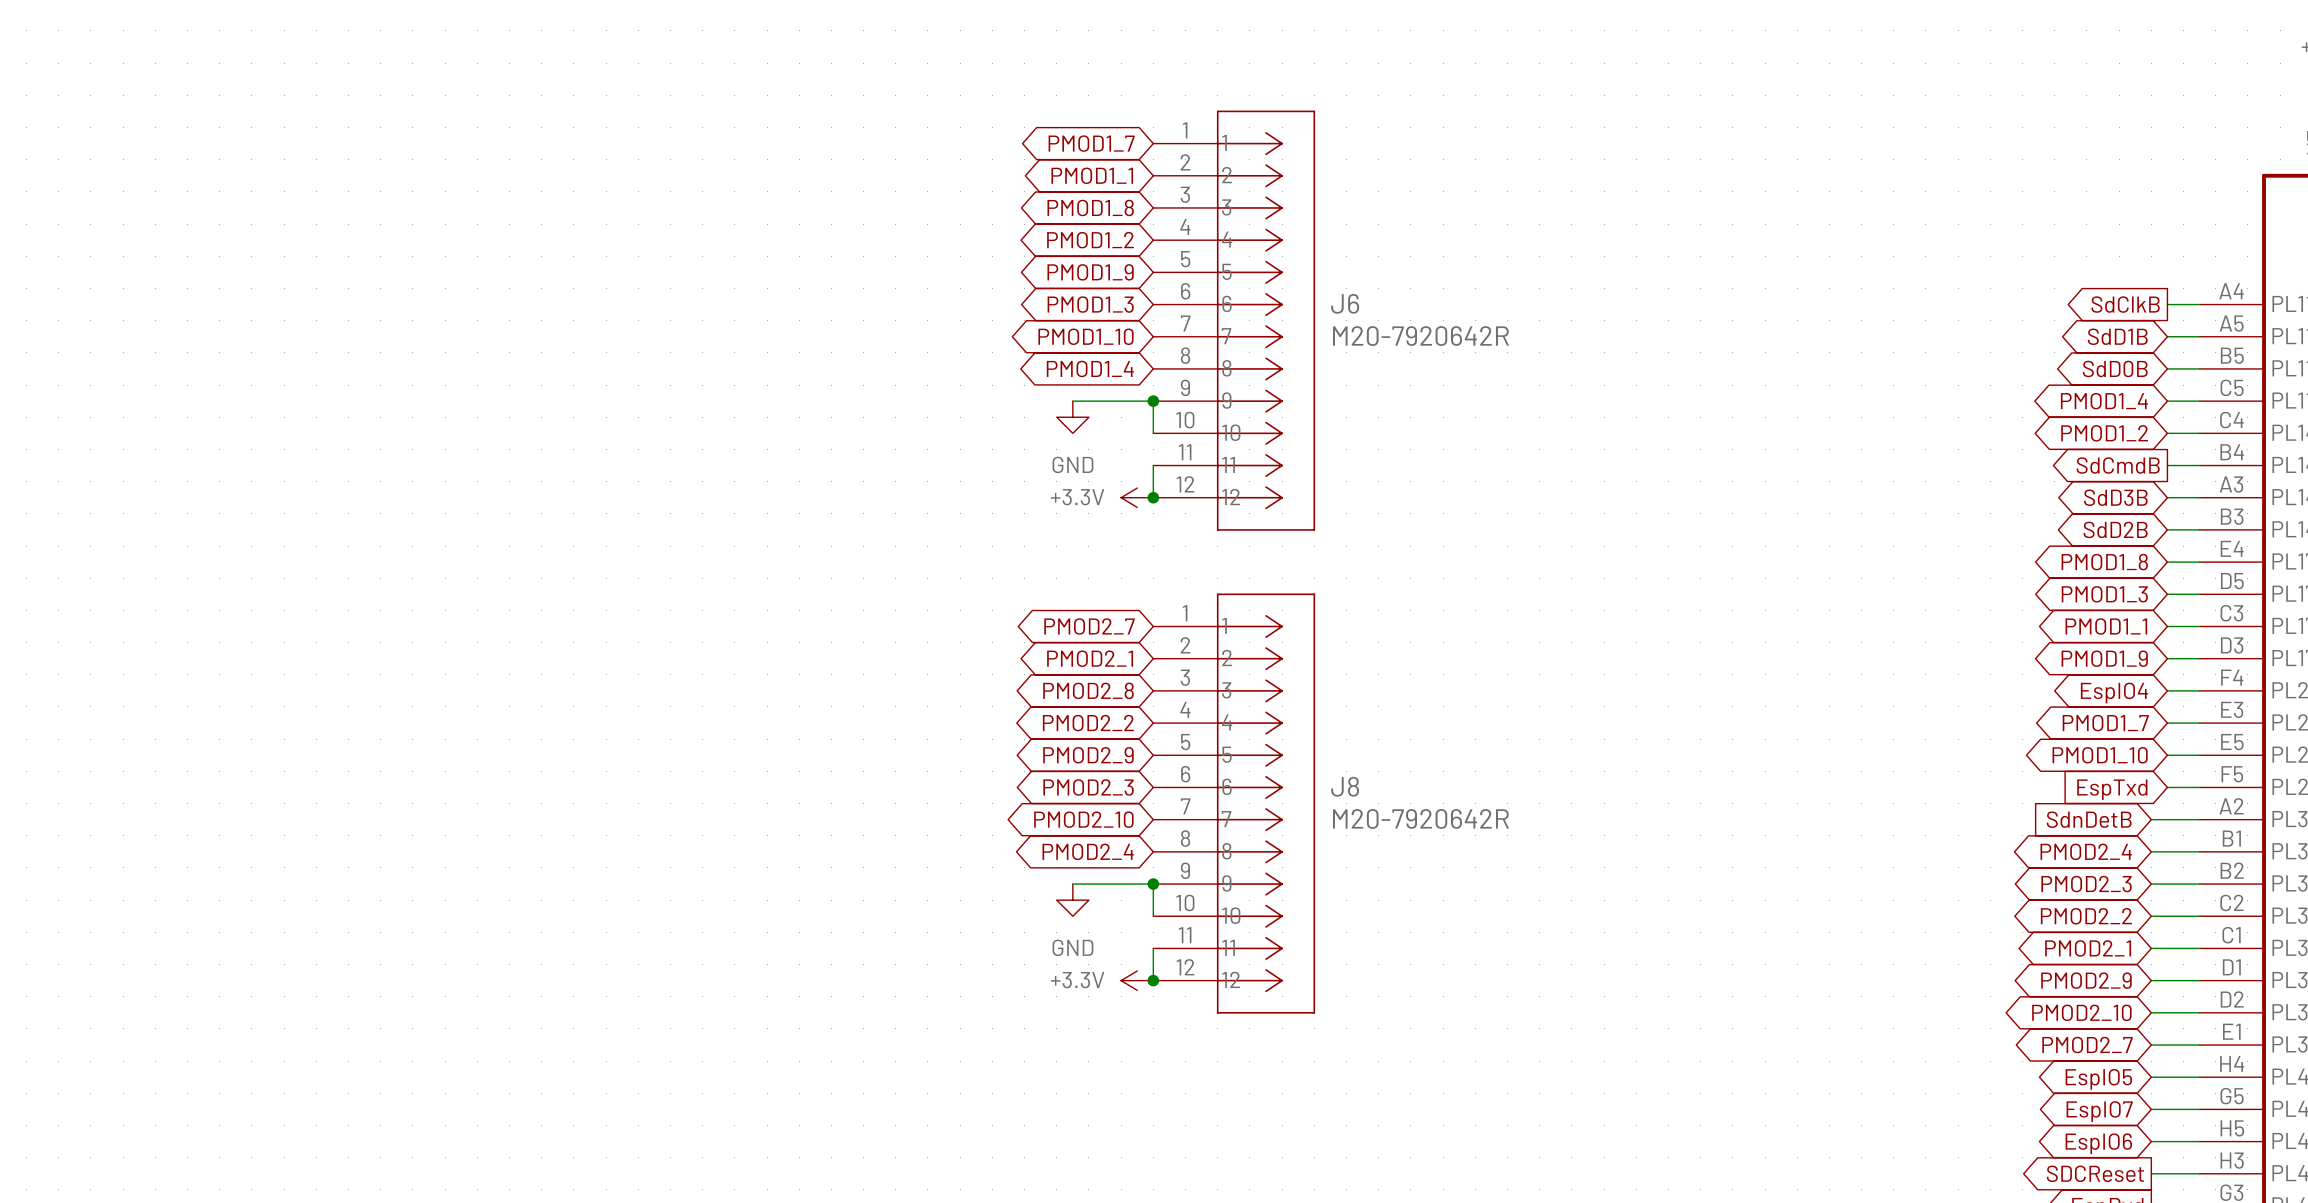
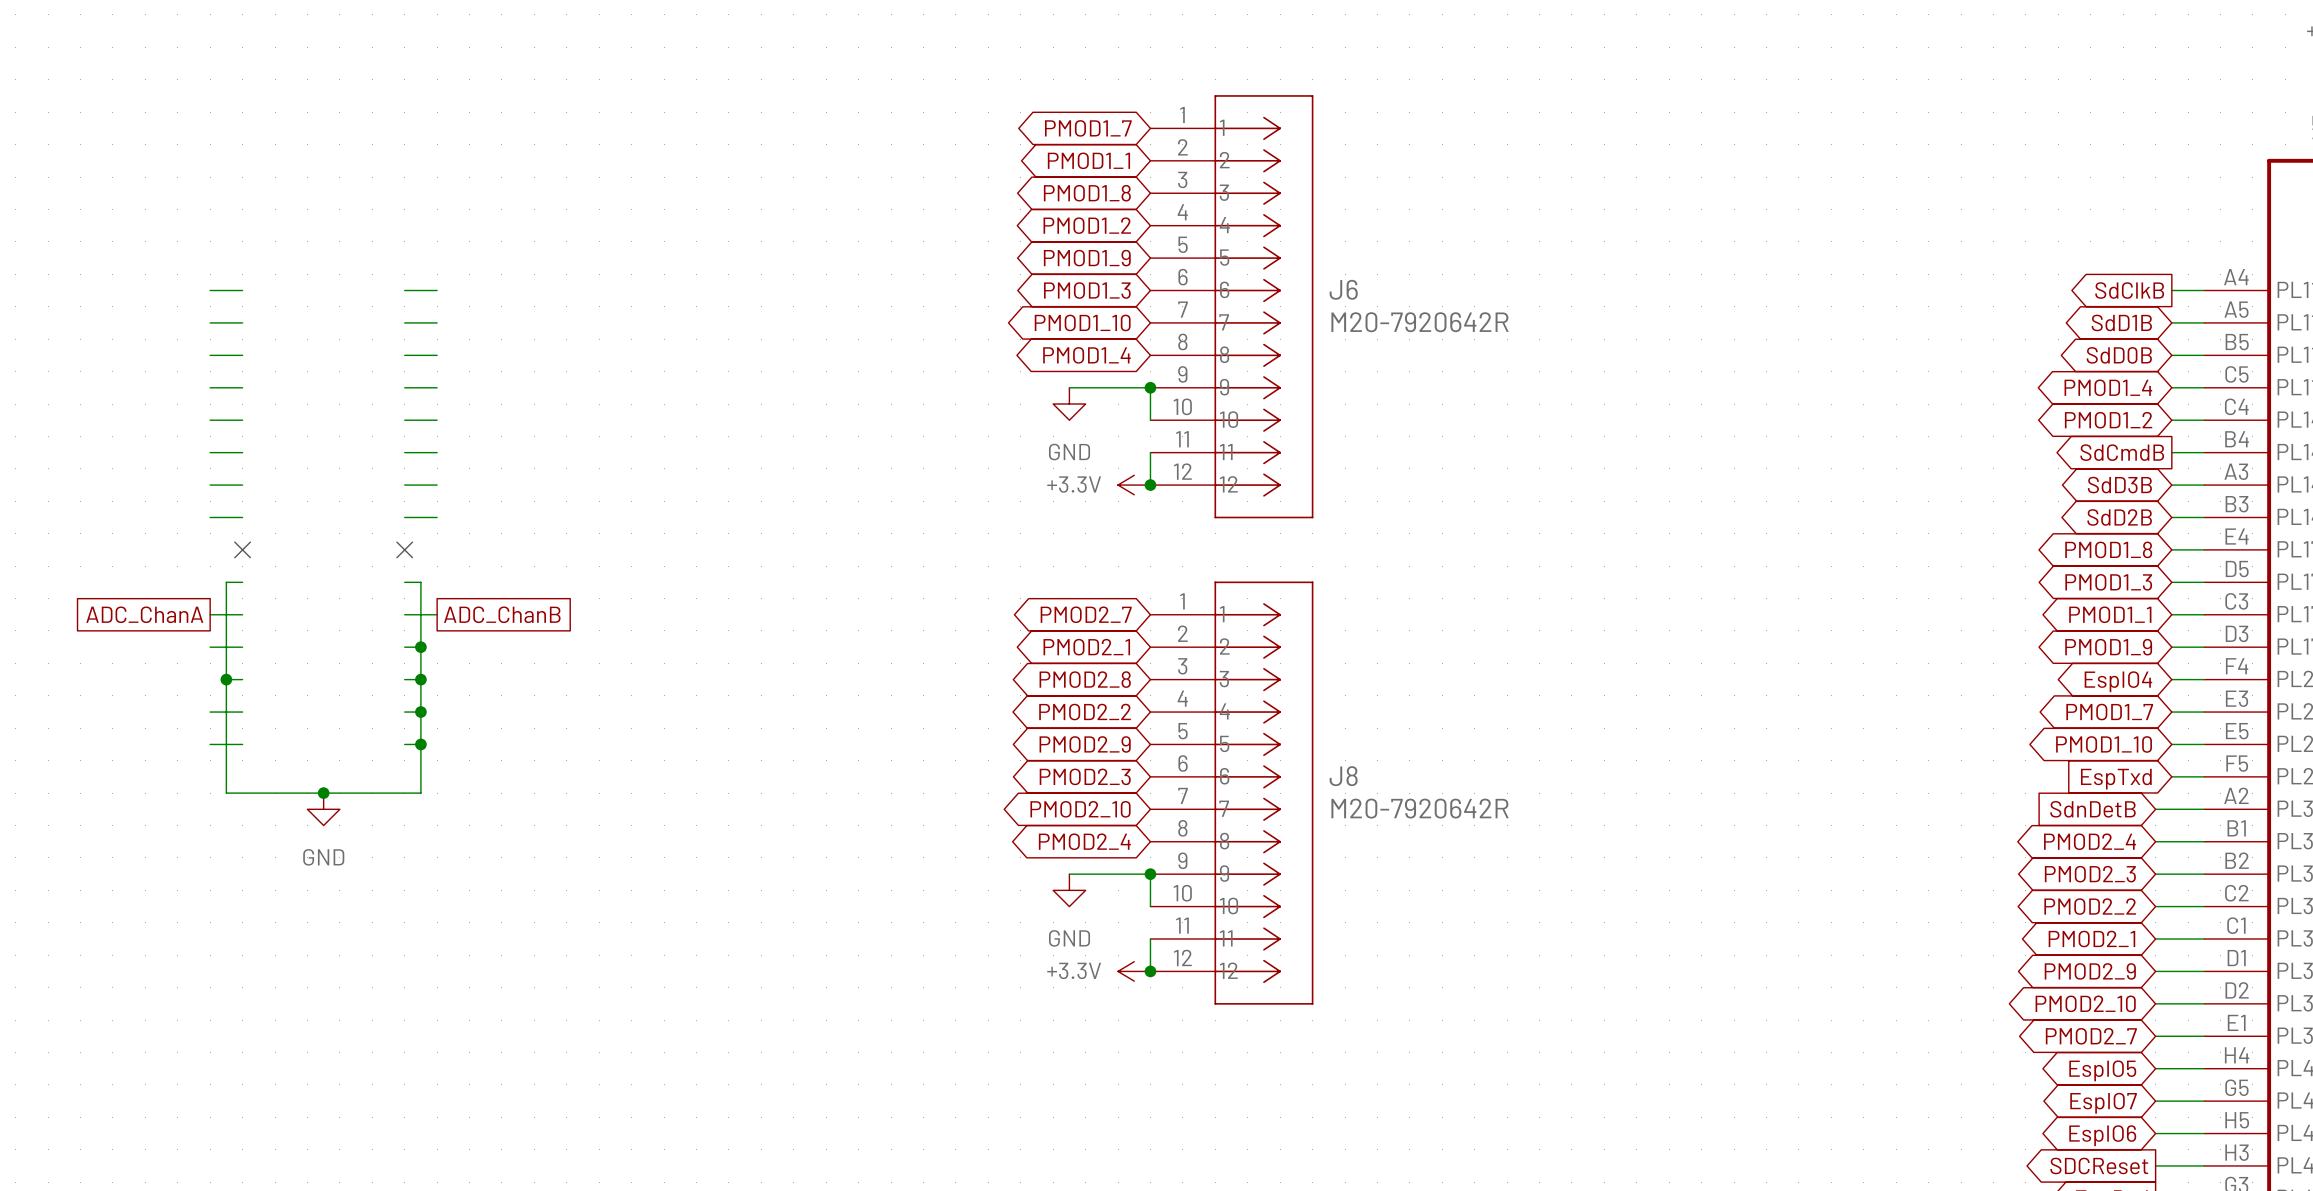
wire: none -> (210, 290) (242, 290)
wire: none -> (404, 290) (437, 290)
wire: none -> (210, 322) (242, 322)
wire: none -> (404, 322) (437, 322)
wire: none -> (210, 355) (242, 355)
wire: none -> (404, 355) (437, 355)
wire: none -> (210, 387) (242, 387)
wire: none -> (404, 387) (437, 387)
wire: none -> (210, 420) (242, 420)
wire: none -> (404, 420) (437, 420)
wire: none -> (210, 452) (242, 452)
wire: none -> (404, 452) (437, 452)
wire: none -> (210, 485) (242, 485)
wire: none -> (404, 485) (437, 485)
wire: none -> (210, 517) (242, 517)
wire: none -> (404, 517) (437, 517)
no-connect mark: none -> (242, 549)
no-connect mark: none -> (404, 549)
wire: none -> (242, 582) (226, 582) (226, 793) (420, 793) (420, 582) (404, 582)
global label: none -> ADC_ChanA (144, 614)
wire: none -> (210, 614) (242, 614)
wire: none -> (404, 614) (437, 614)
global label: none -> ADC_ChanB (502, 614)
wire: none -> (210, 647) (242, 647)
wire: none -> (404, 647) (420, 647)
junction: none -> (420, 647)
wire: none -> (226, 679) (242, 679)
junction: none -> (226, 679)
wire: none -> (404, 679) (420, 679)
junction: none -> (420, 679)
wire: none -> (210, 712) (242, 712)
wire: none -> (404, 712) (420, 712)
junction: none -> (420, 712)
wire: none -> (210, 744) (242, 744)
wire: none -> (404, 744) (420, 744)
junction: none -> (420, 744)
junction: none -> (323, 793)
power symbol: none -> GND (323, 809)

